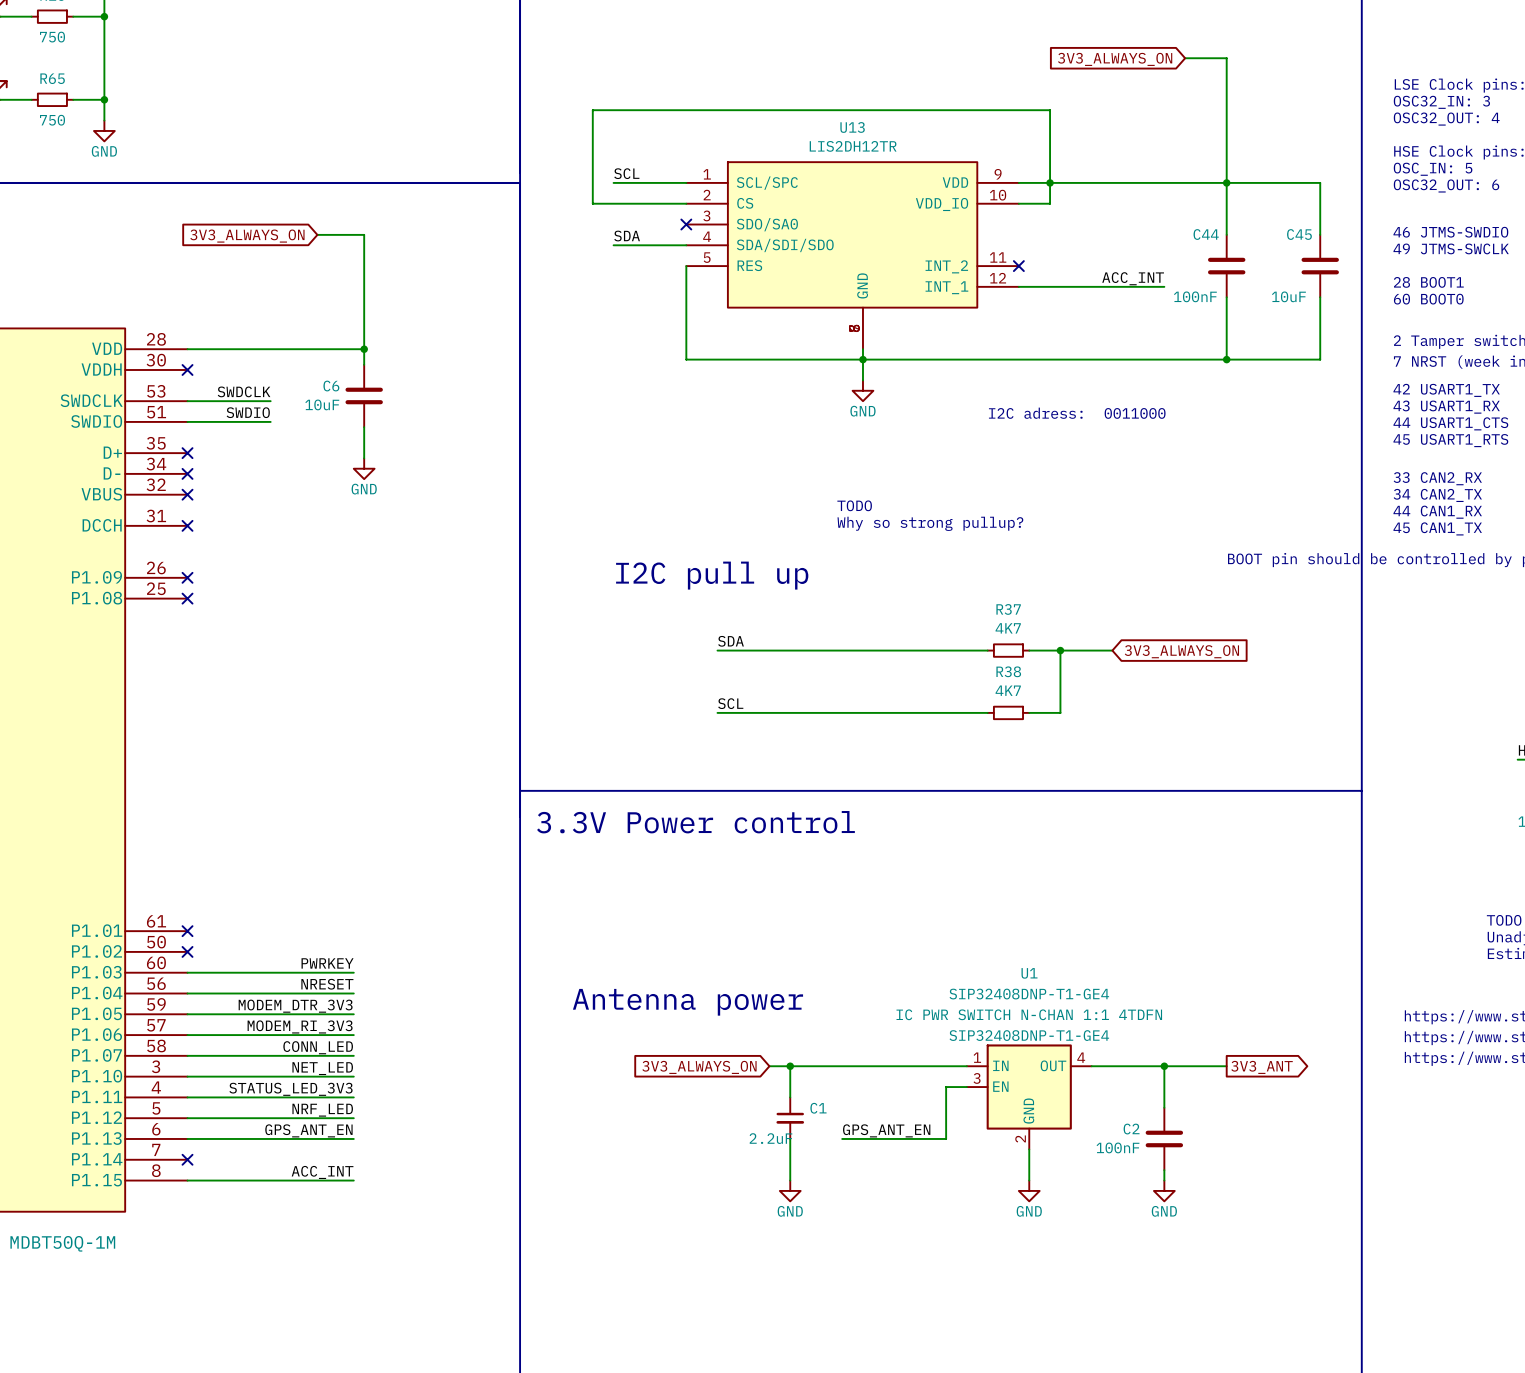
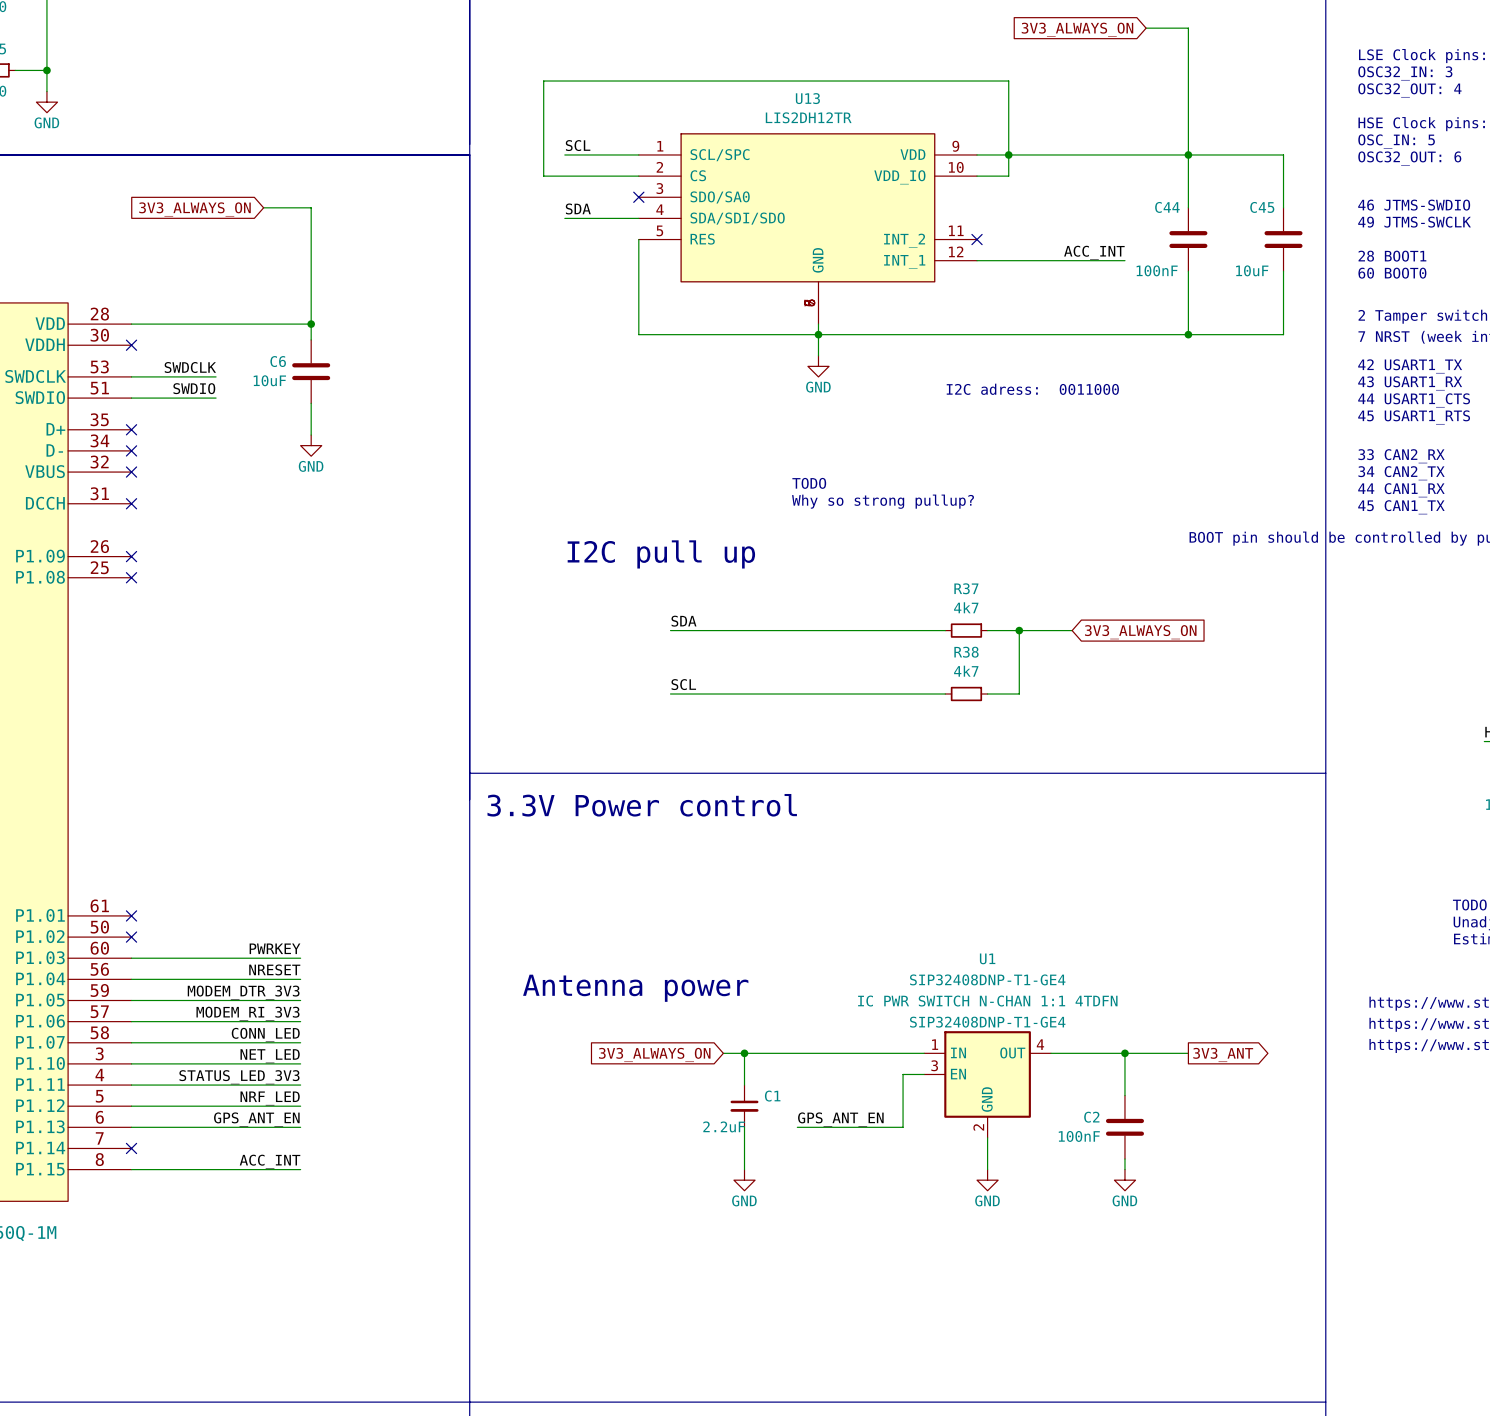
R37 value: 4K7 (1008, 628) -> 4k7 (966, 607)
R38 value: 4K7 (1008, 690) -> 4k7 (966, 671)

